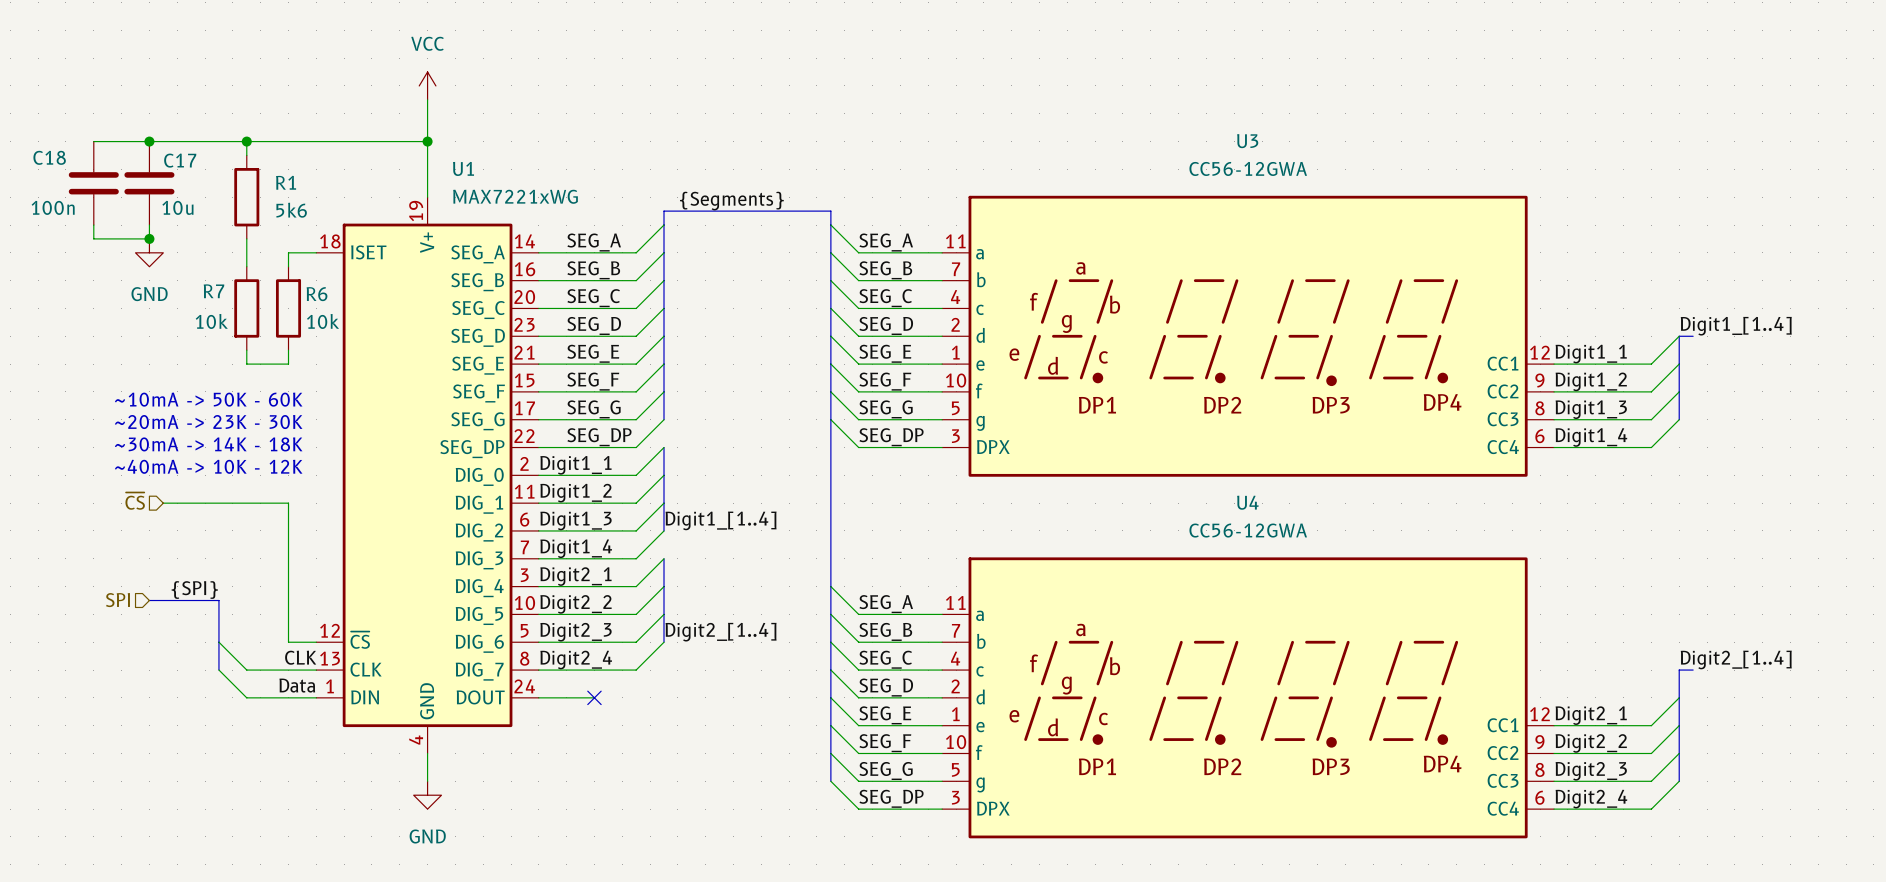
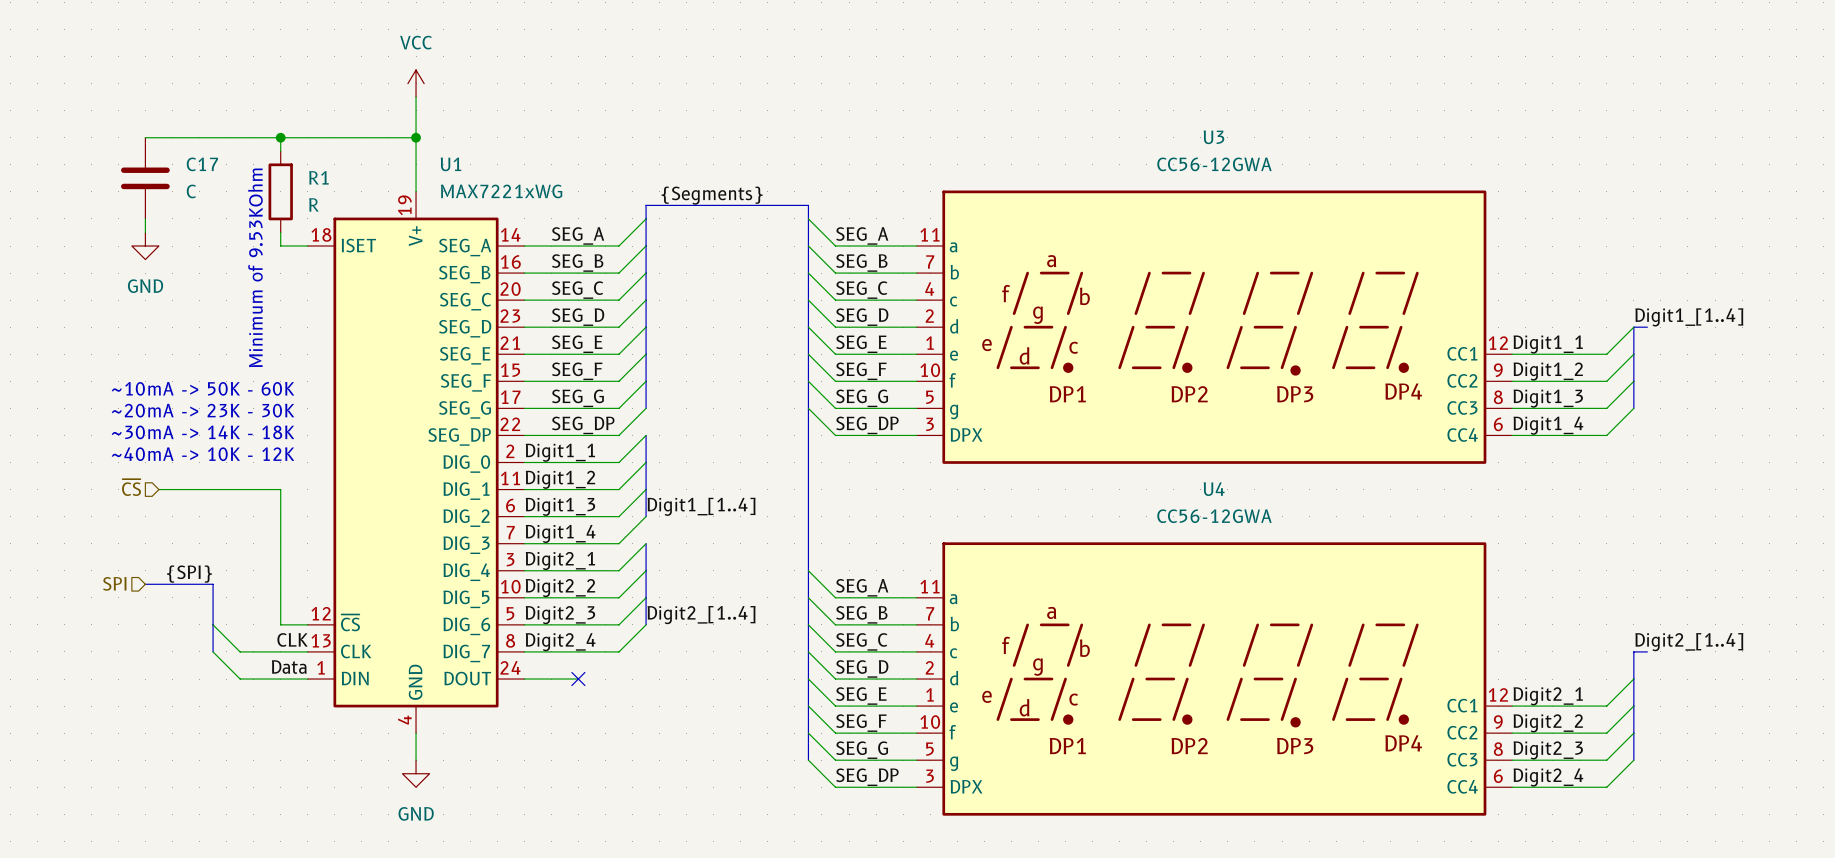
wire: (93, 141) (149, 141) -> none
junction: (149, 141) -> none
wire: (246, 141) (246, 155) -> (280, 137) (280, 151)
junction position: (246, 141) -> (280, 137)
C17 name position: C17 (180, 160) -> C17 (202, 164)
C18: 100n (93, 183) -> none
R1 position: (246, 197) -> (280, 191)
C17 value: 10u (177, 207) -> C (191, 191)
R1 value: 5k6 (291, 210) -> R (313, 204)
wire: (93, 225) (93, 238) (149, 238) -> none
junction: (149, 238) -> none
wire: (246, 238) (246, 266) -> none
wire: (288, 252) (288, 266) -> (280, 246) (280, 232)
text: none -> Minimum of 9.53KOhm (255, 267)
R7: 10k (246, 308) -> none
R6: 10k (288, 308) -> none
wire: (246, 350) (246, 364) (288, 364) (288, 350) -> none

